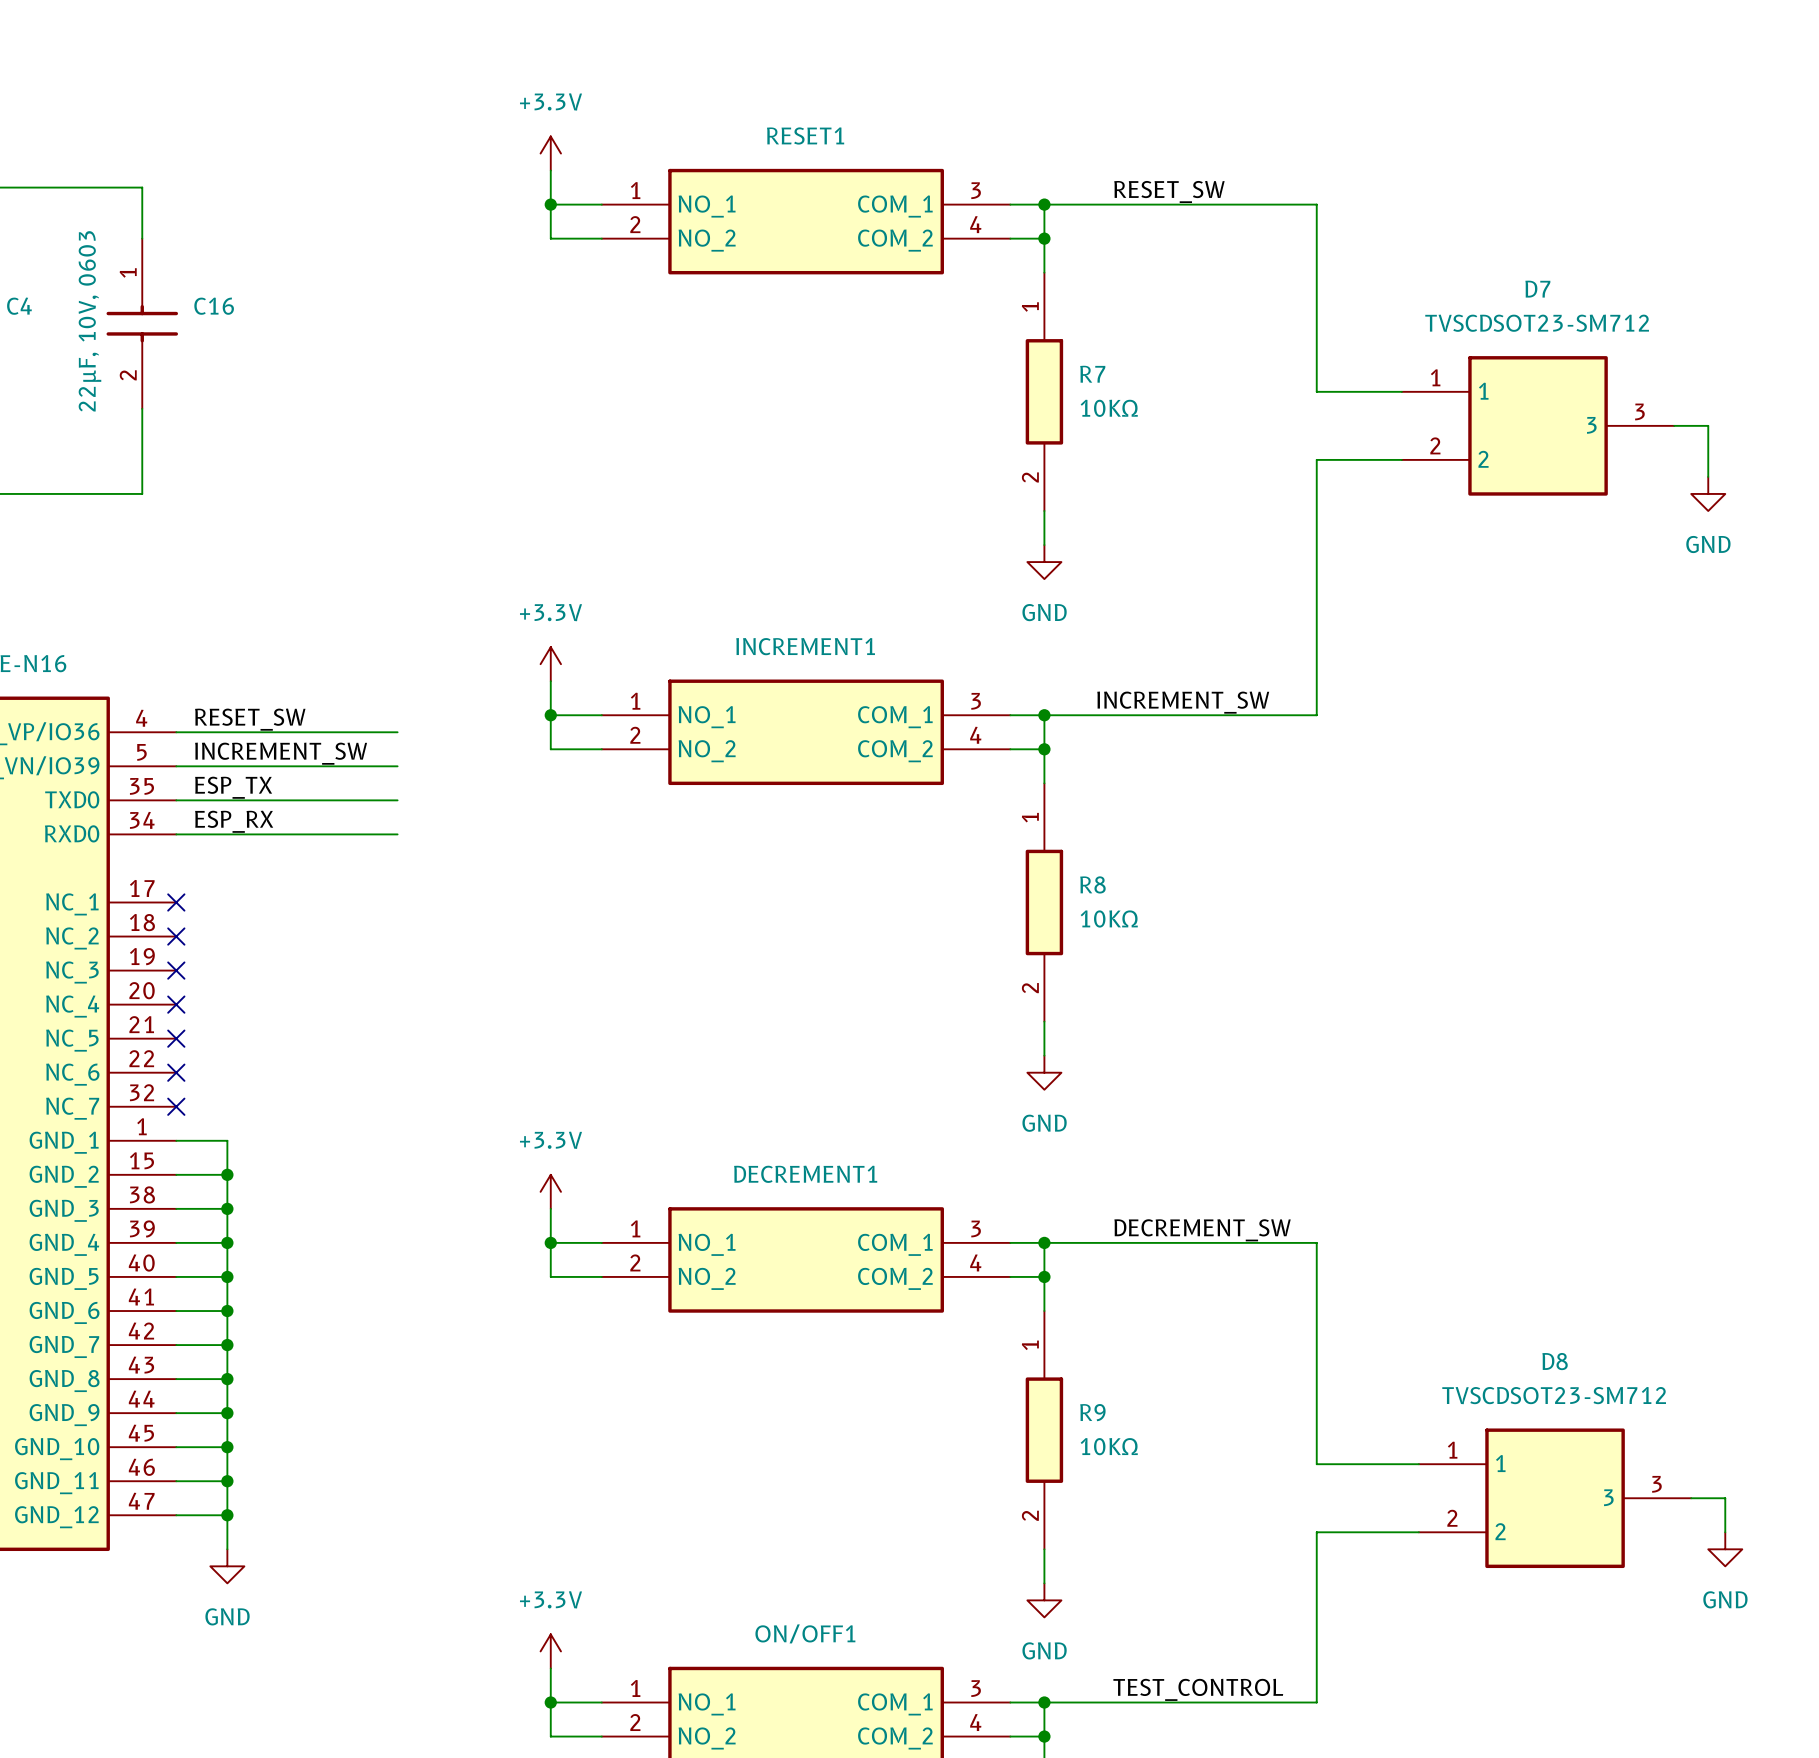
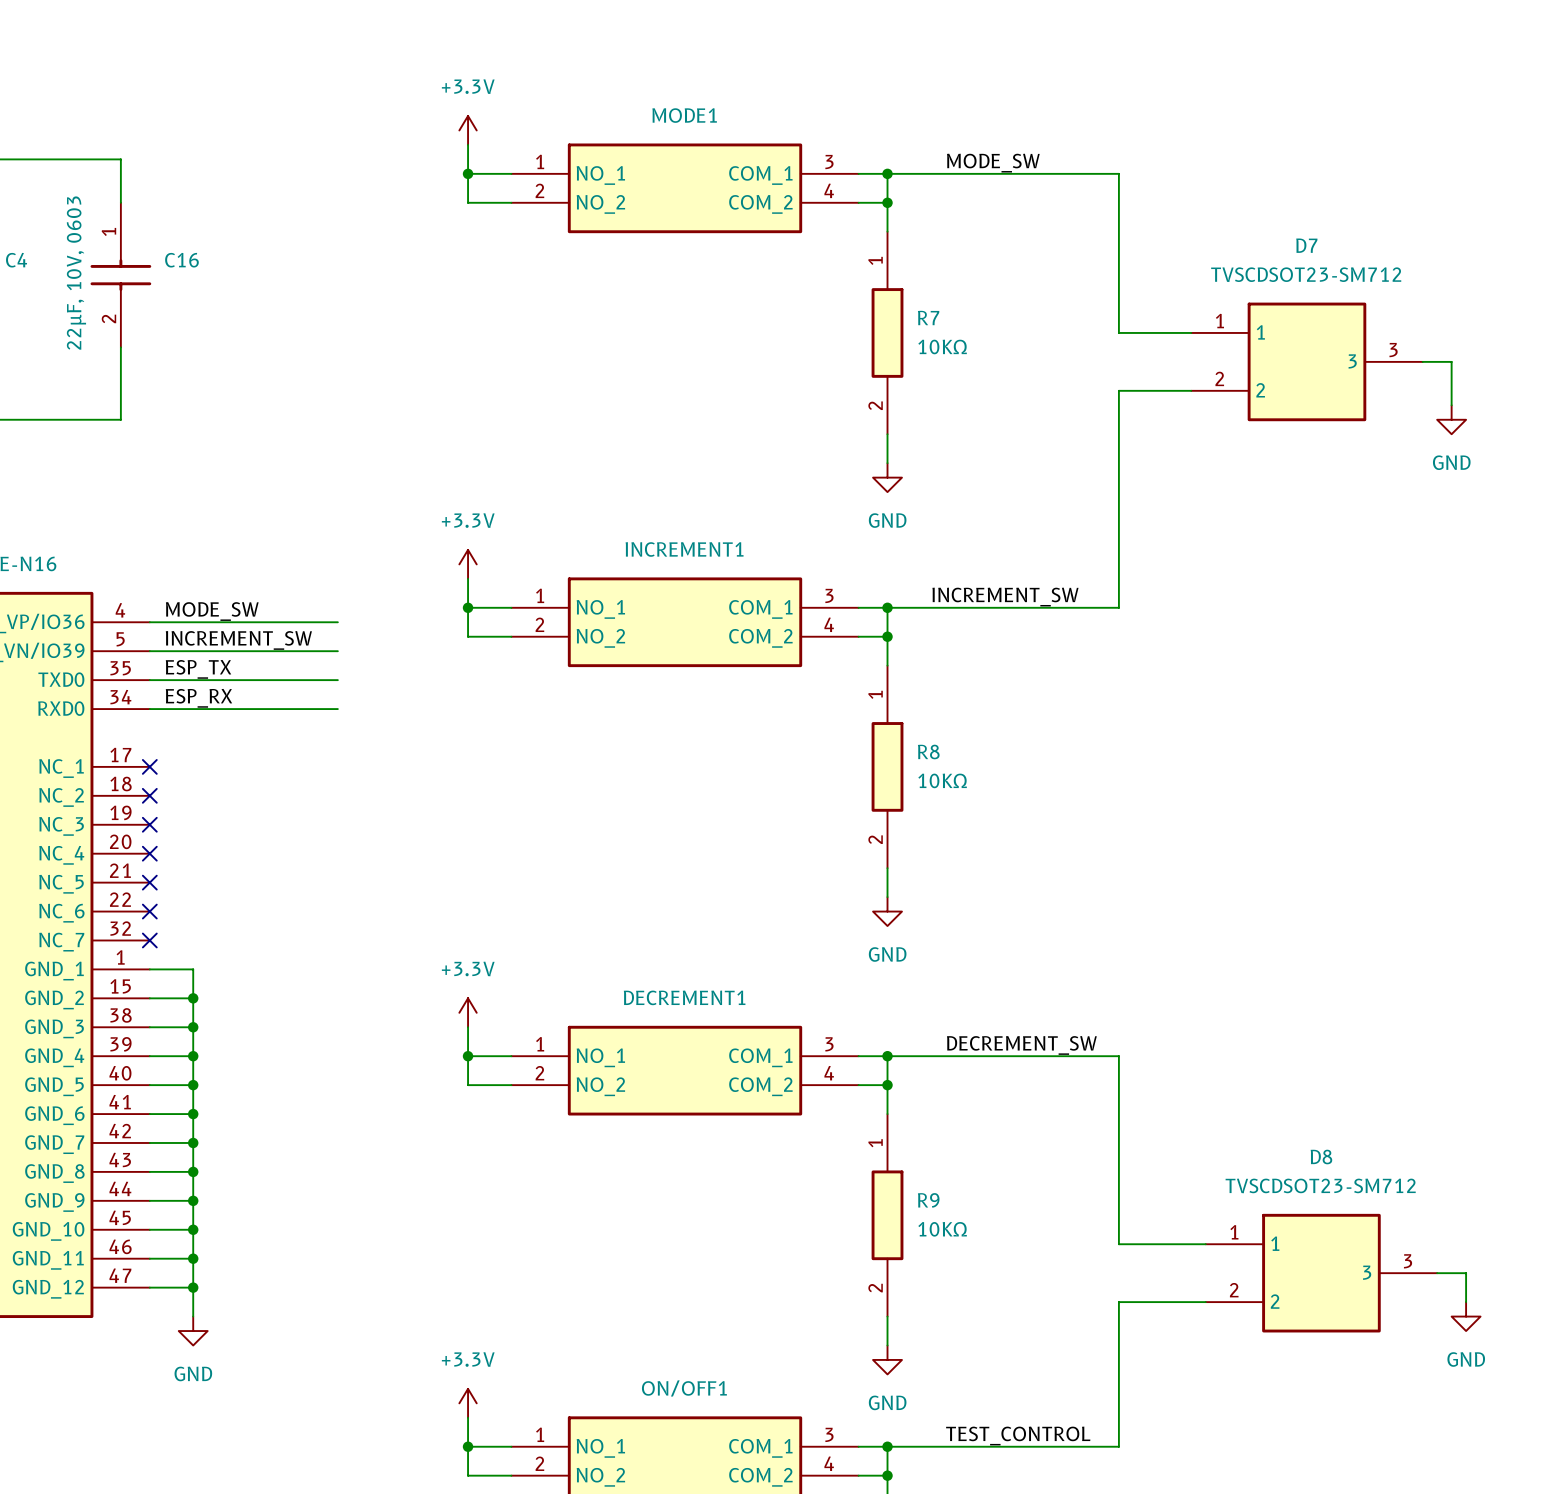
RESET1 name: RESET1 (805, 135) -> MODE1 (684, 115)
label: RESET_SW (1169, 191) -> MODE_SW (993, 163)
label: RESET_SW (250, 719) -> MODE_SW (212, 611)

